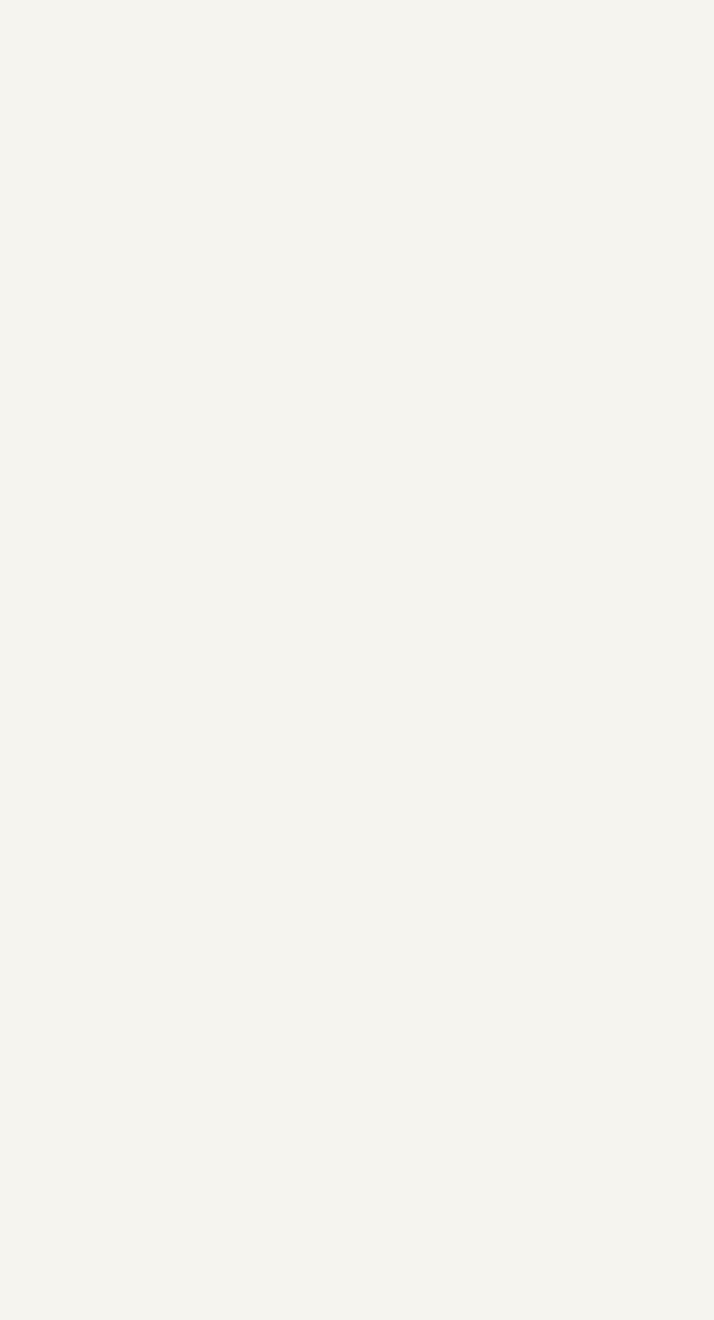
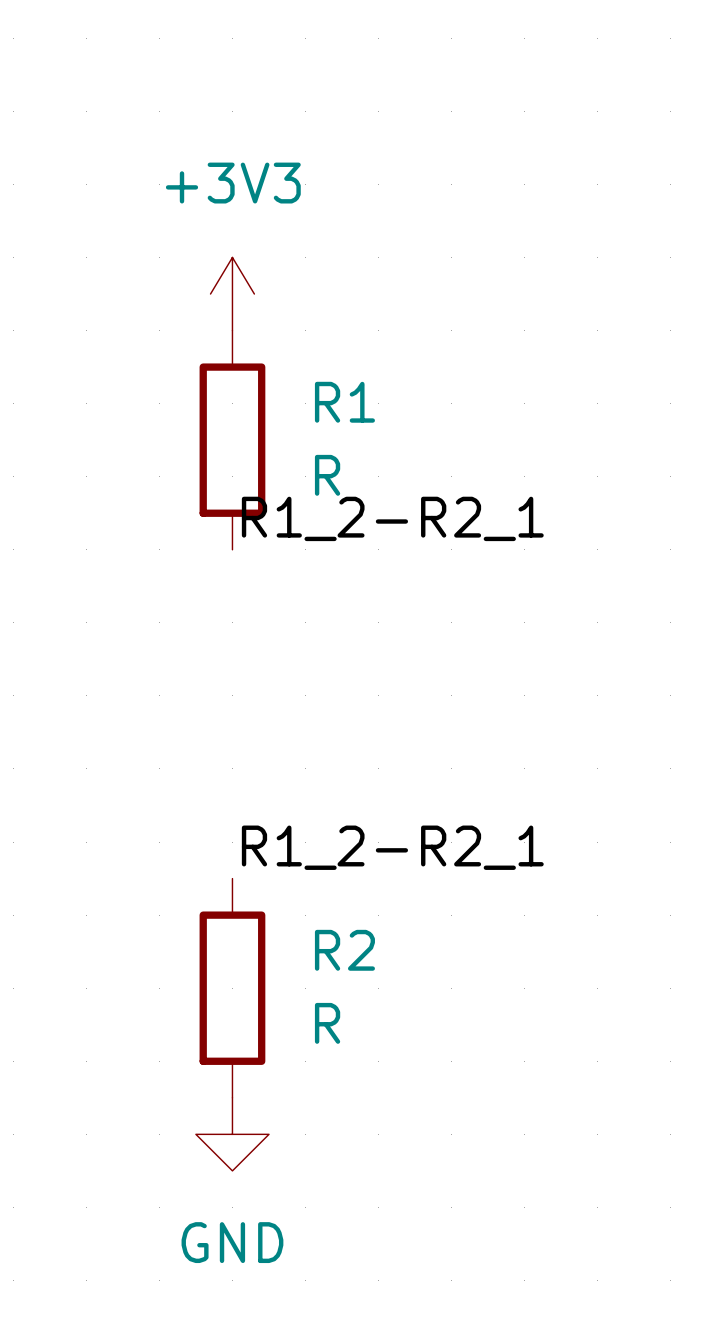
power symbol: none -> +3V3 (232, 294)
R1: none -> R (232, 440)
label: none -> R1_2-R2_1 (392, 518)
label: none -> R1_2-R2_1 (392, 847)
R2: none -> R (232, 988)
power symbol: none -> GND (232, 1134)

